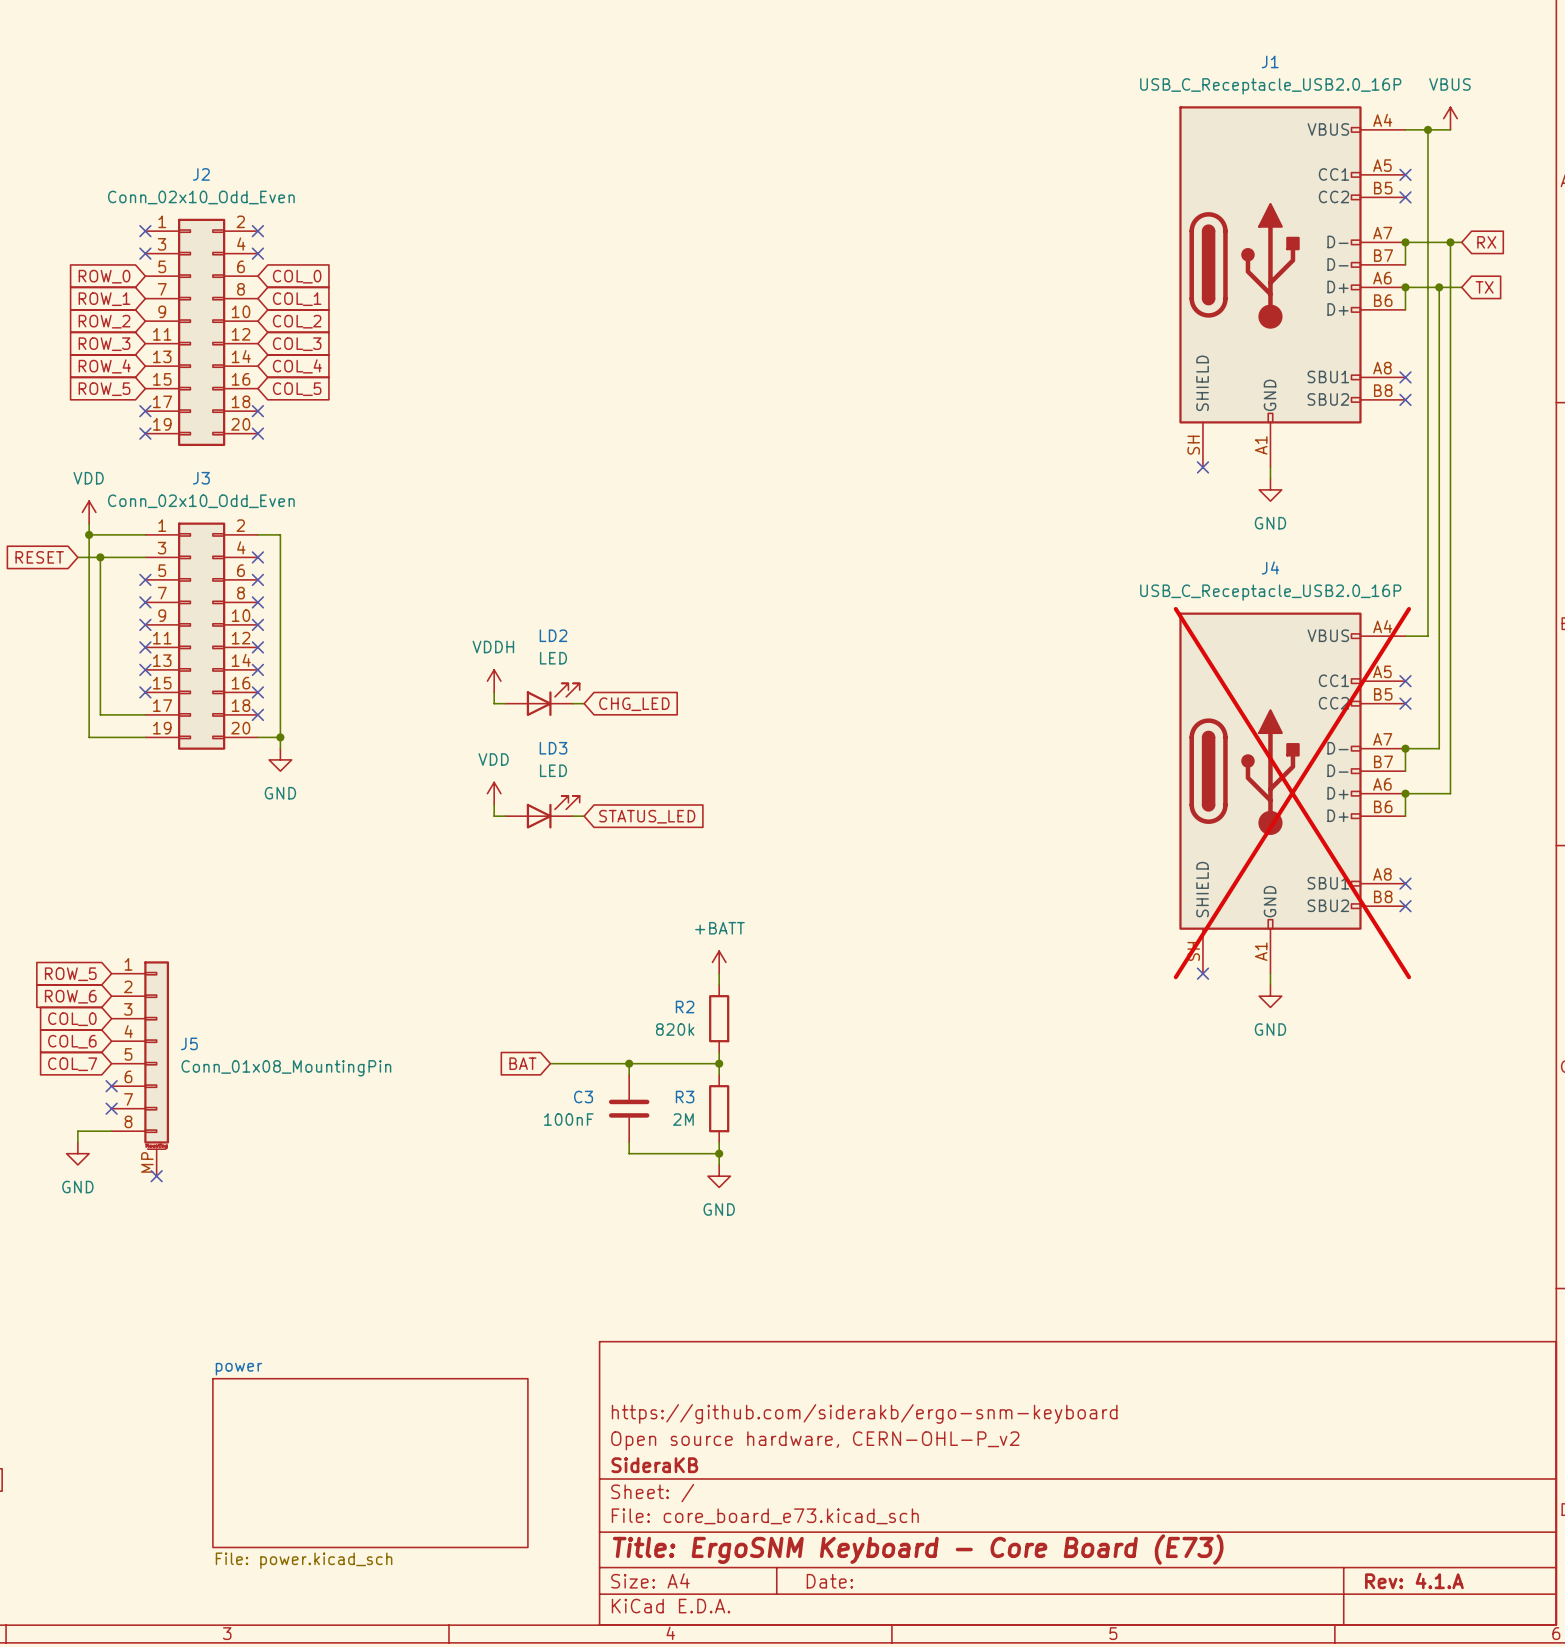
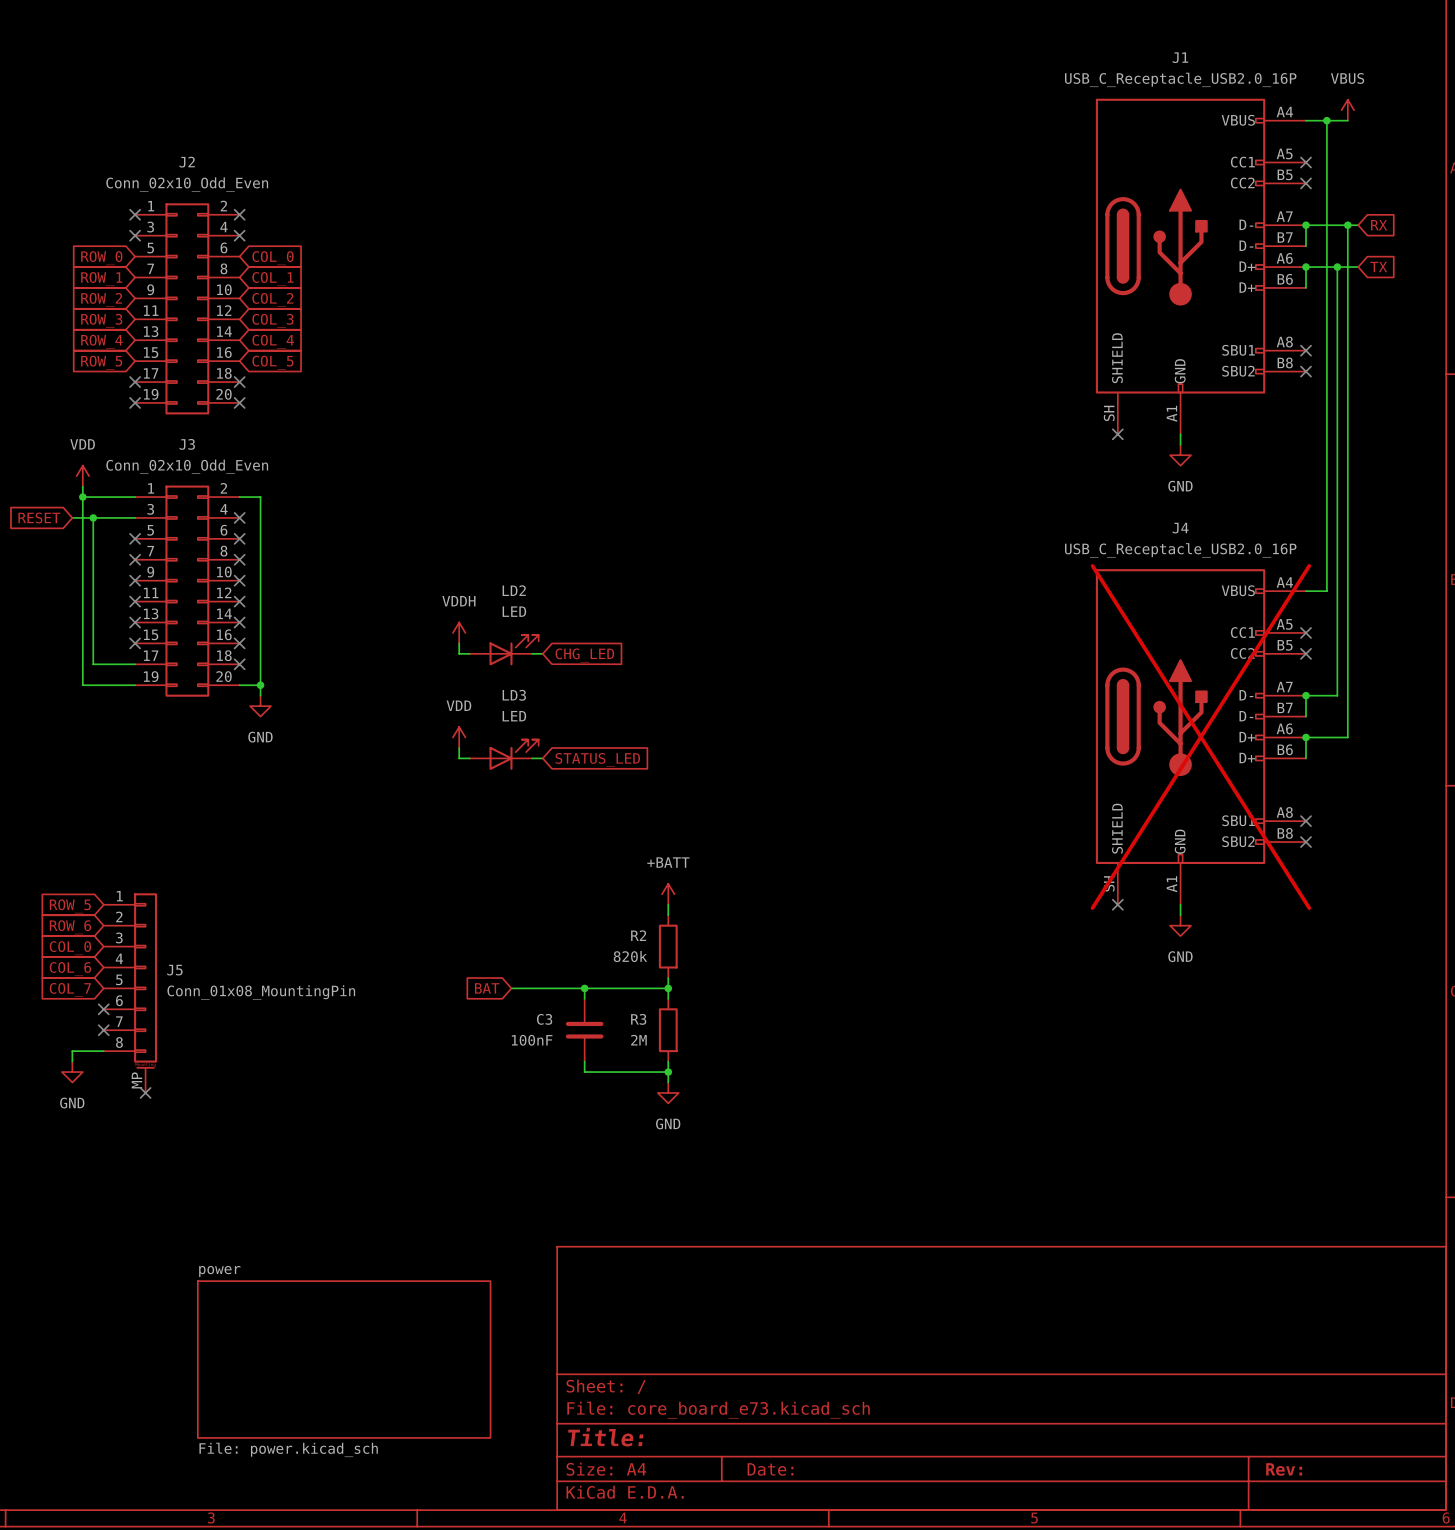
title block: https://github.com/siderakb/ergo-snm-keyboard (864, 1413) -> none
title block: Open source hardware, CERN-OHL-P_v2 (815, 1440) -> none
title block: SideraKB (654, 1465) -> none
title block: Title: ErgoSNM Keyboard - Core Board (E73) (918, 1549) -> Title: (605, 1437)
title block: Rev: 4.1.A (1414, 1580) -> Rev: (1284, 1469)

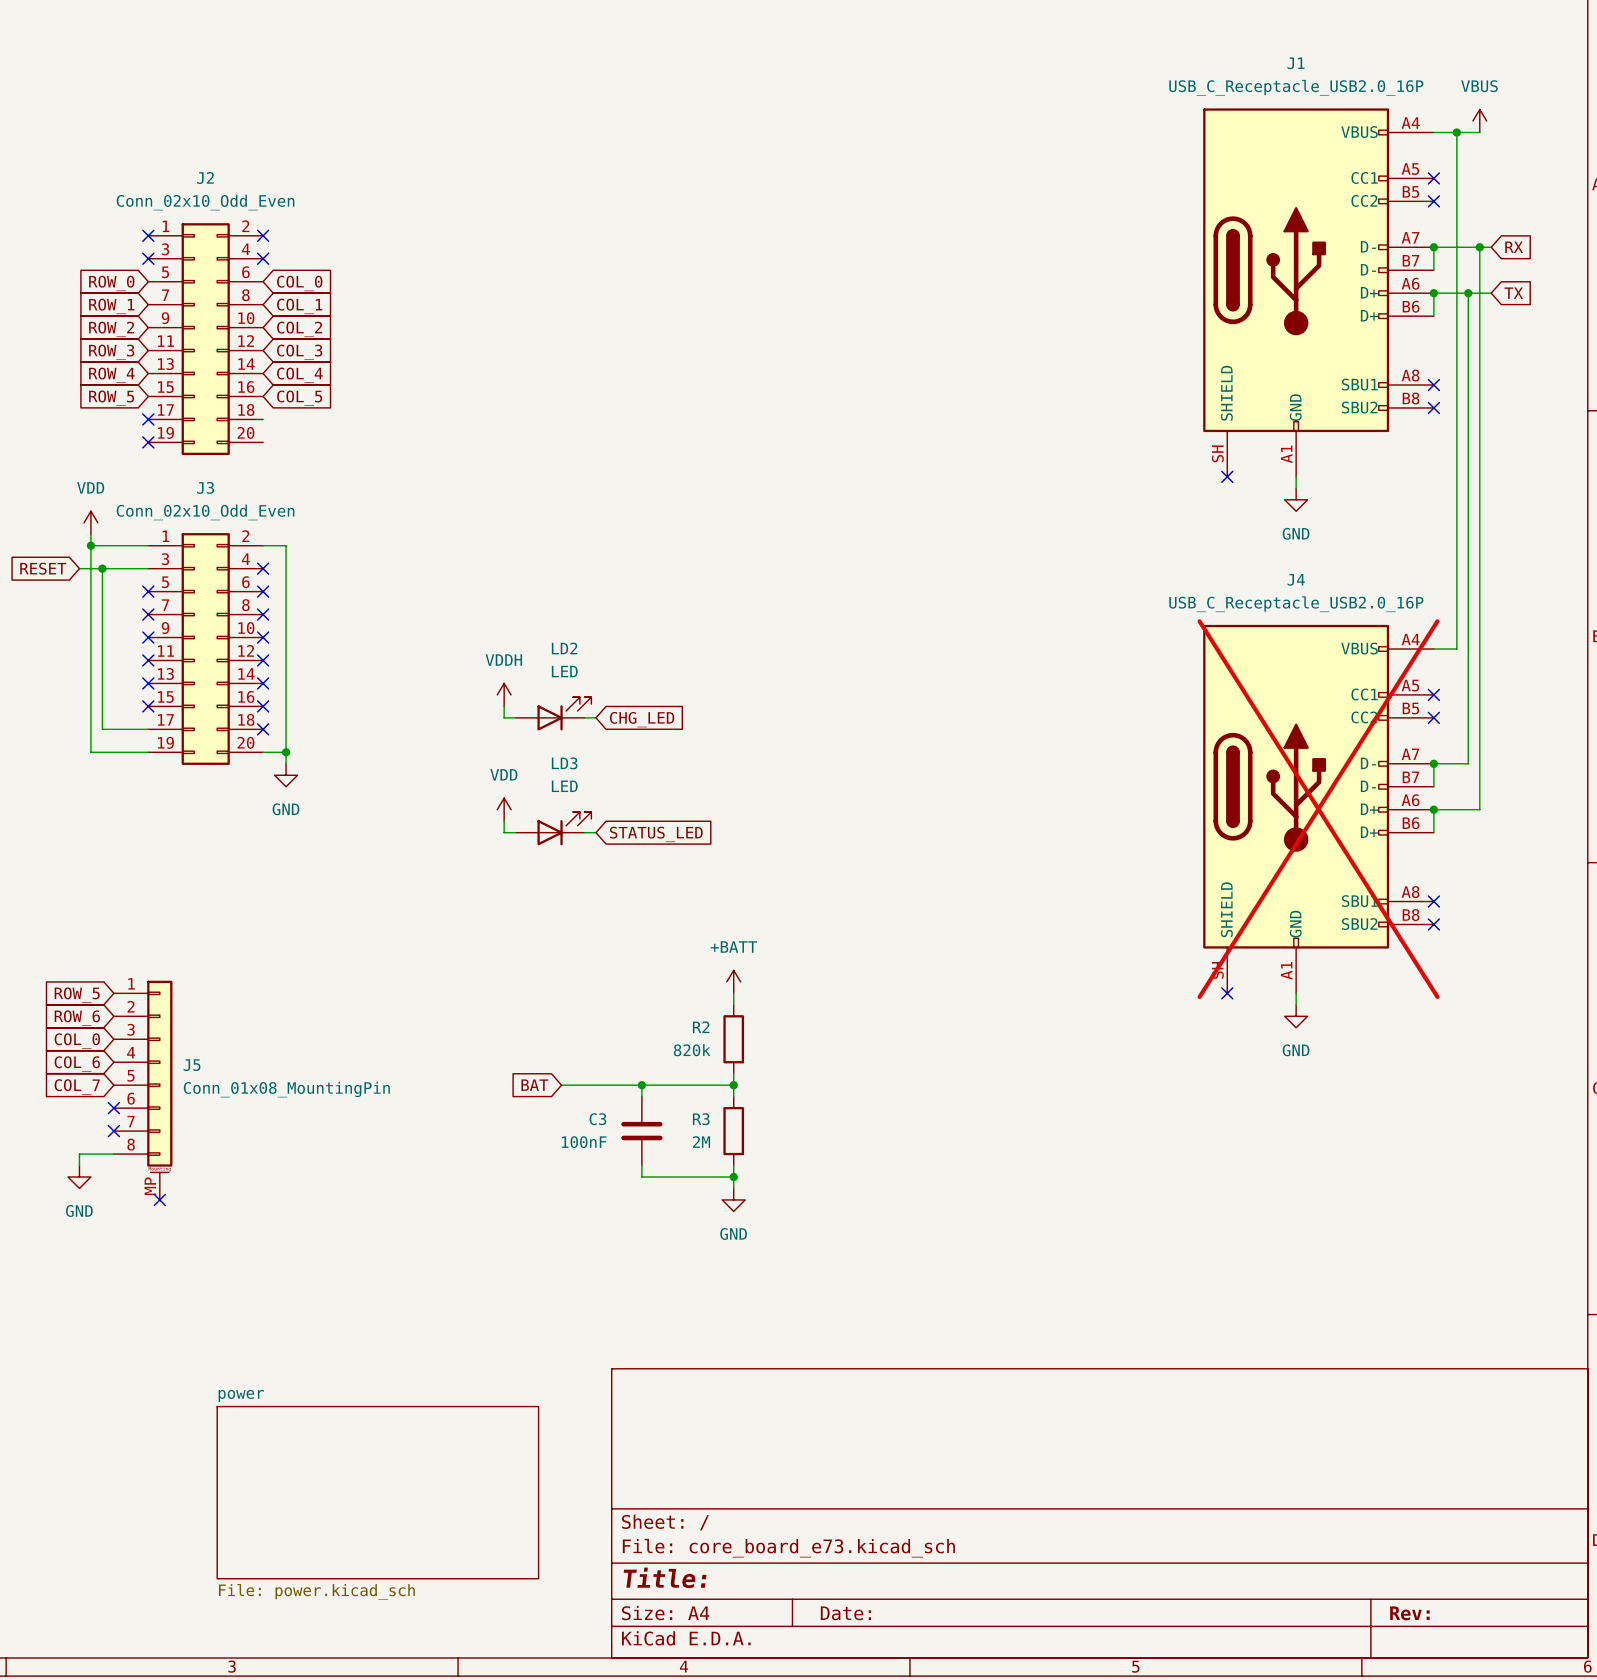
no-connect mark: (239, 382) -> none
no-connect mark: (239, 402) -> none

